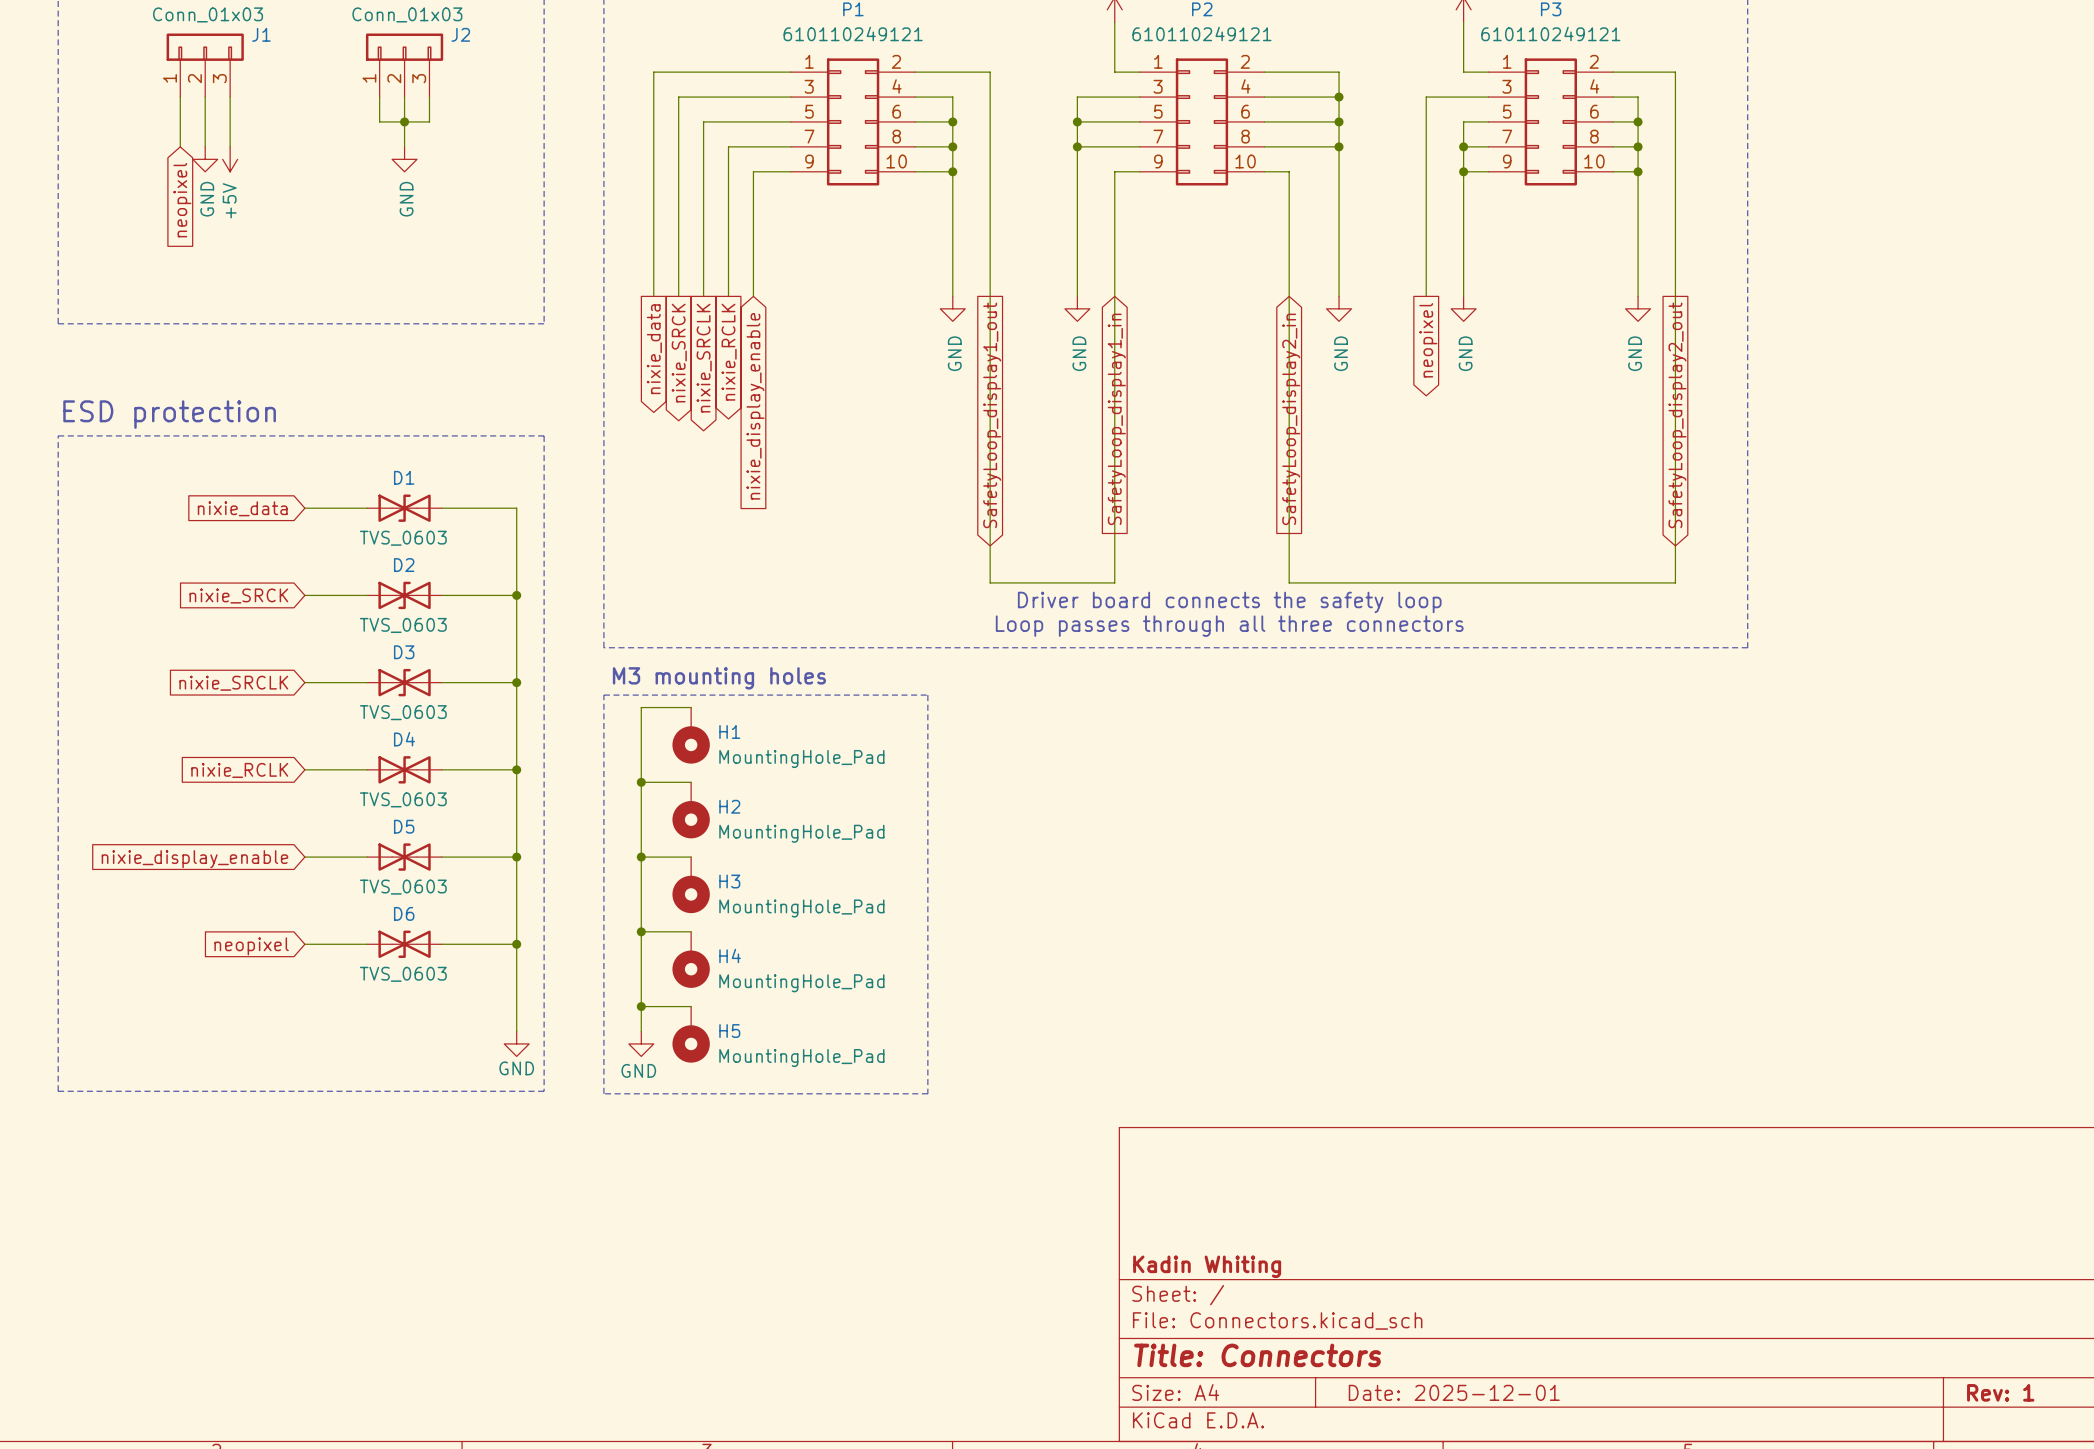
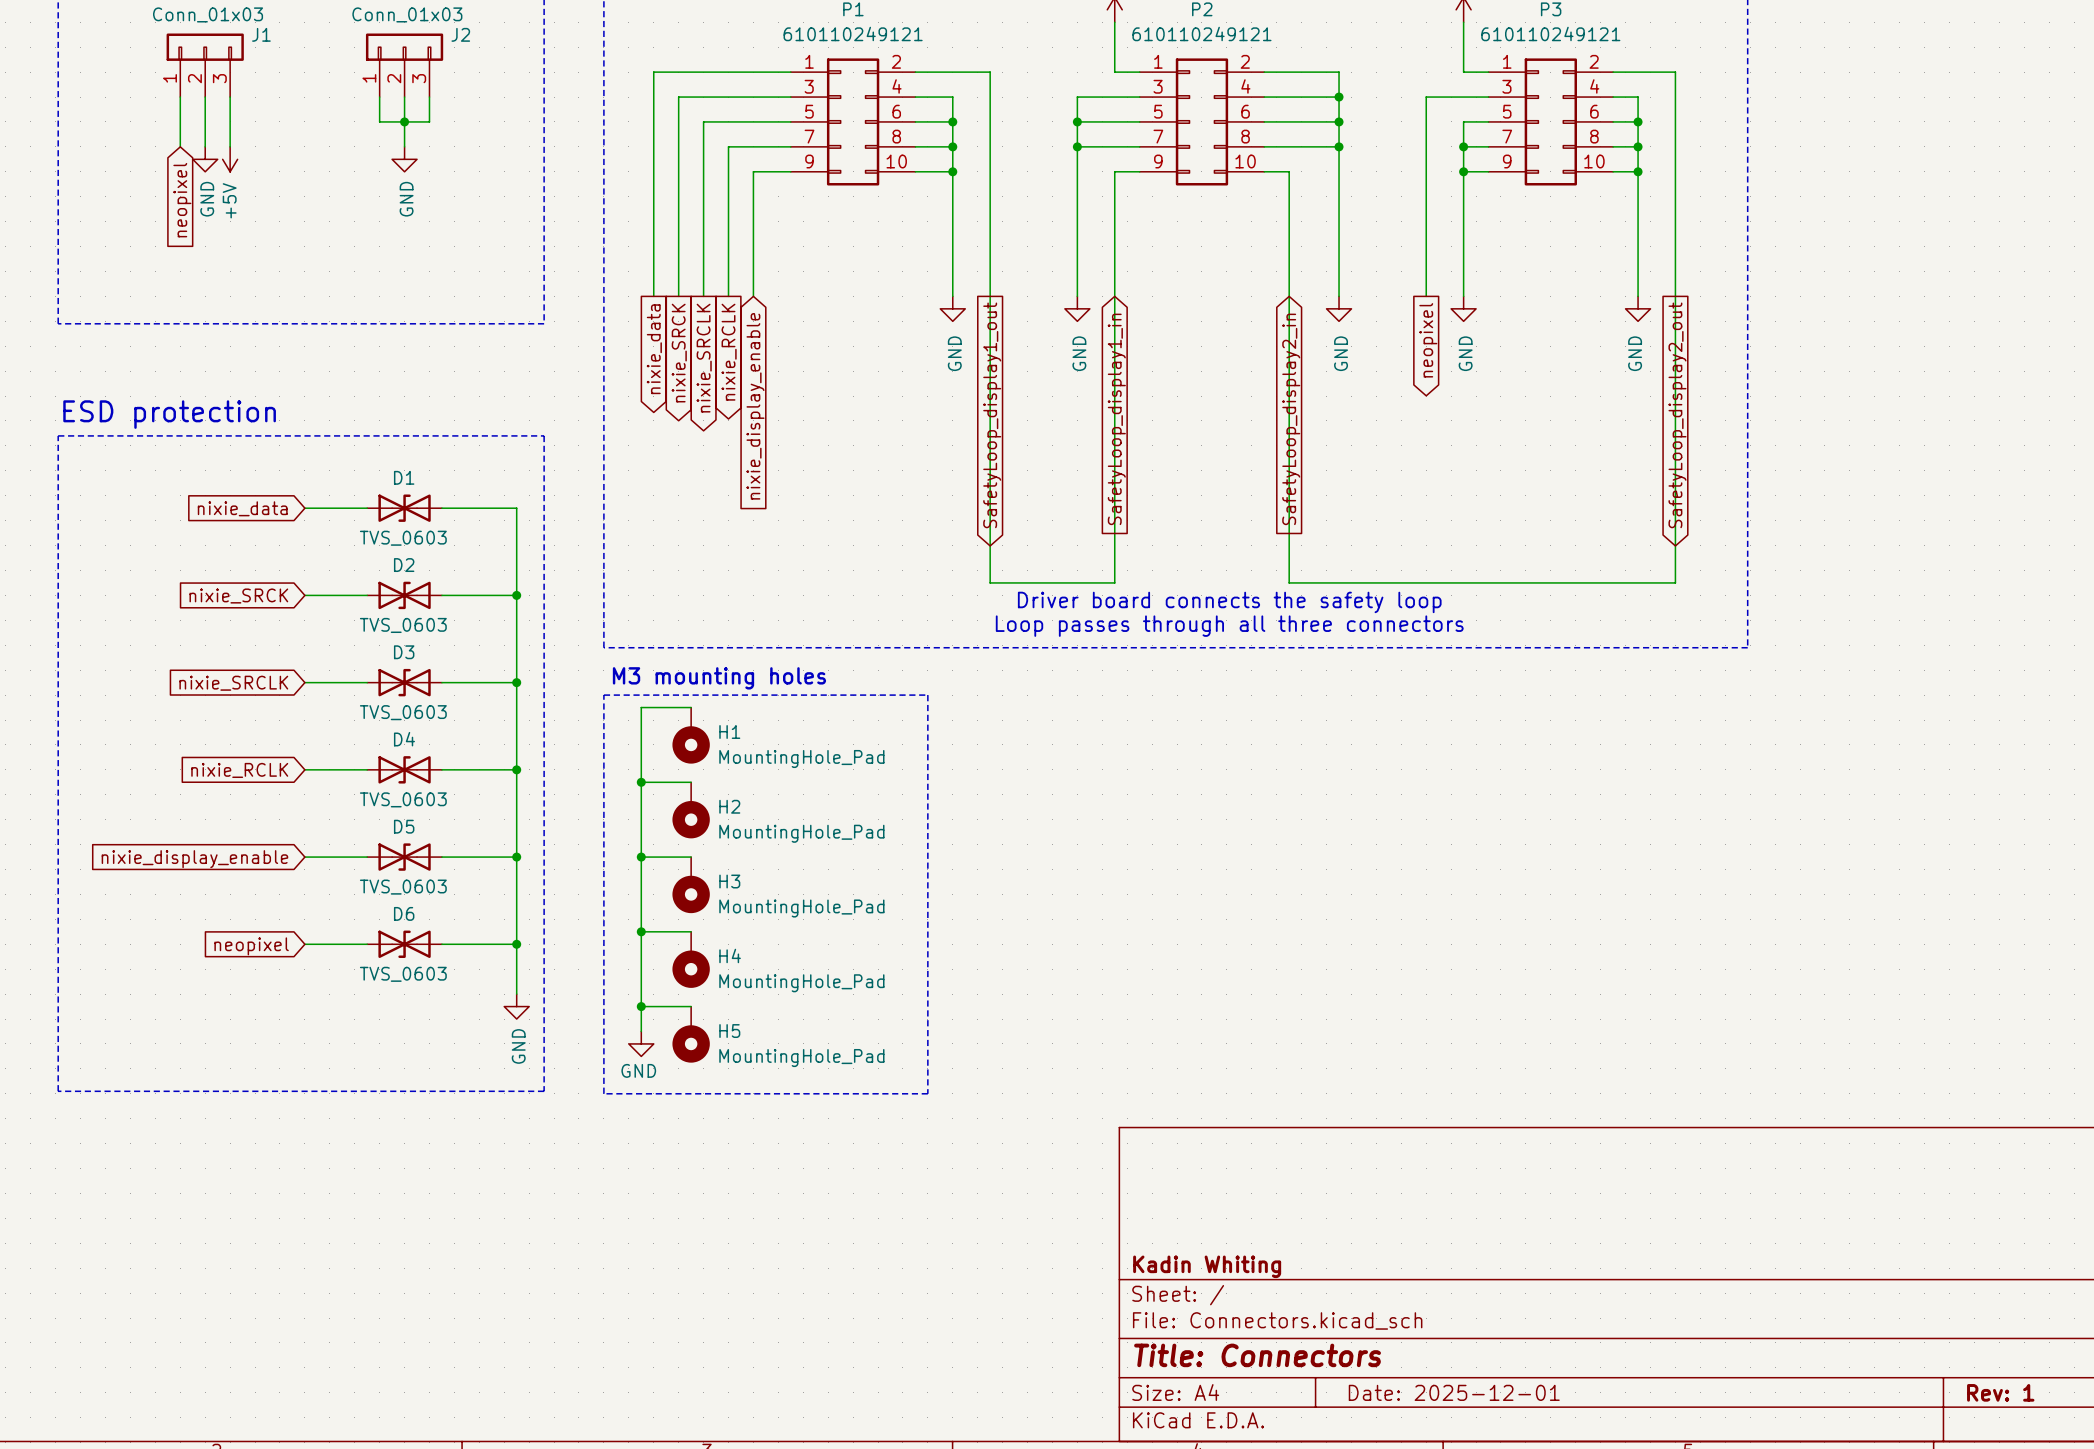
wire: (516, 994) (516, 1031) -> none
power symbol position: GND (516, 1043) -> GND (516, 1006)
power symbol text rotation: 0° (516, 1068) -> 90° counterclockwise (518, 1046)

